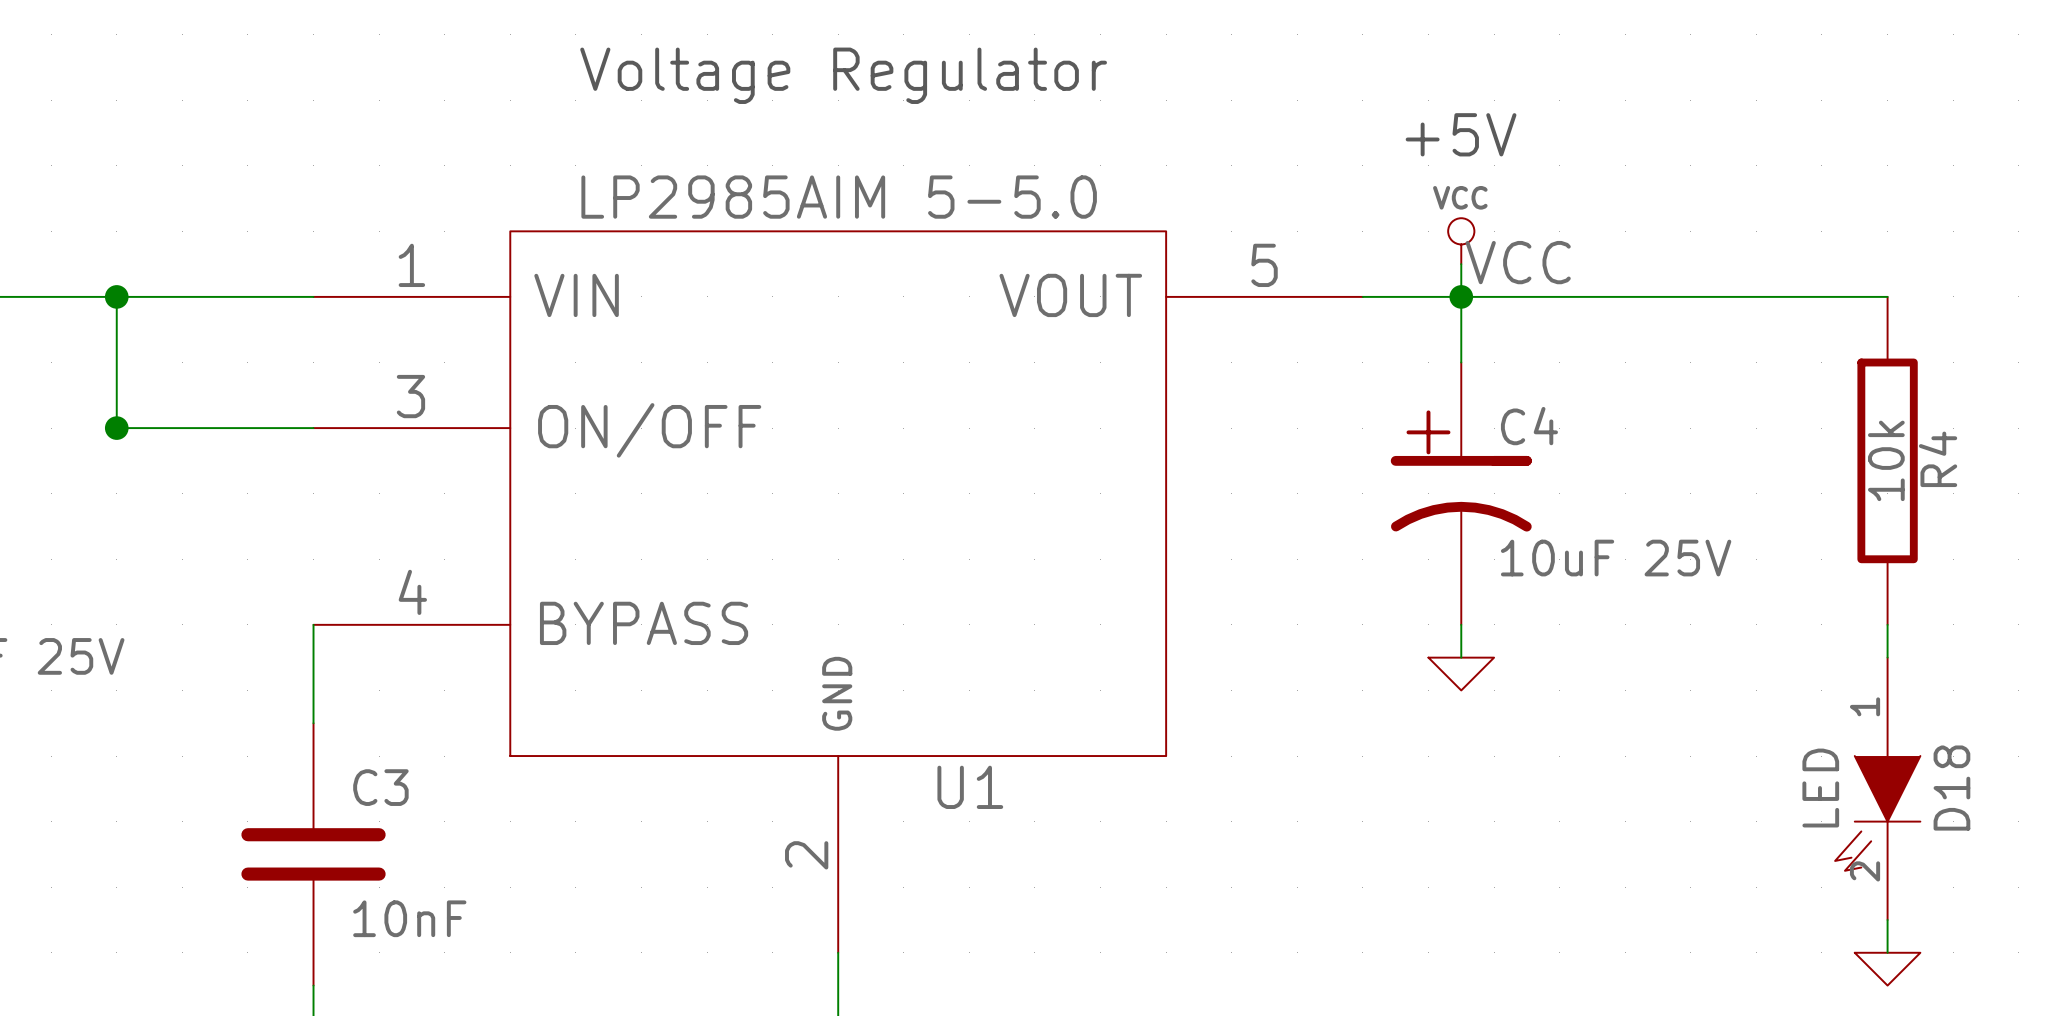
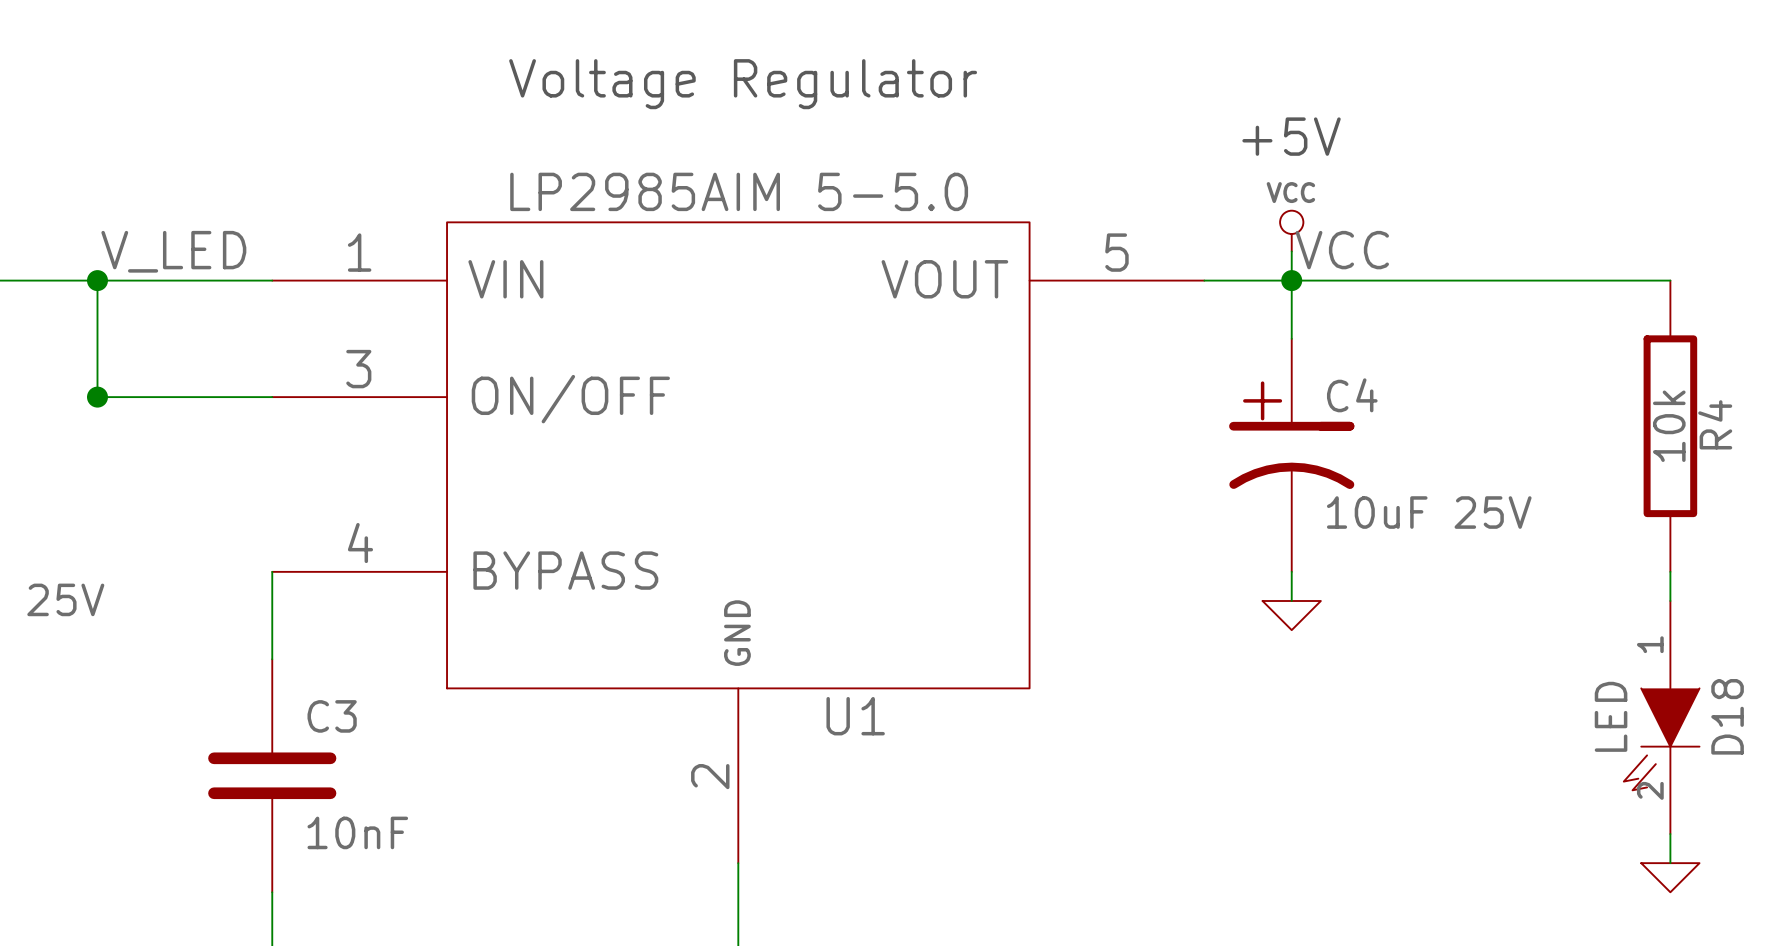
label: none -> V_LED (173, 251)

